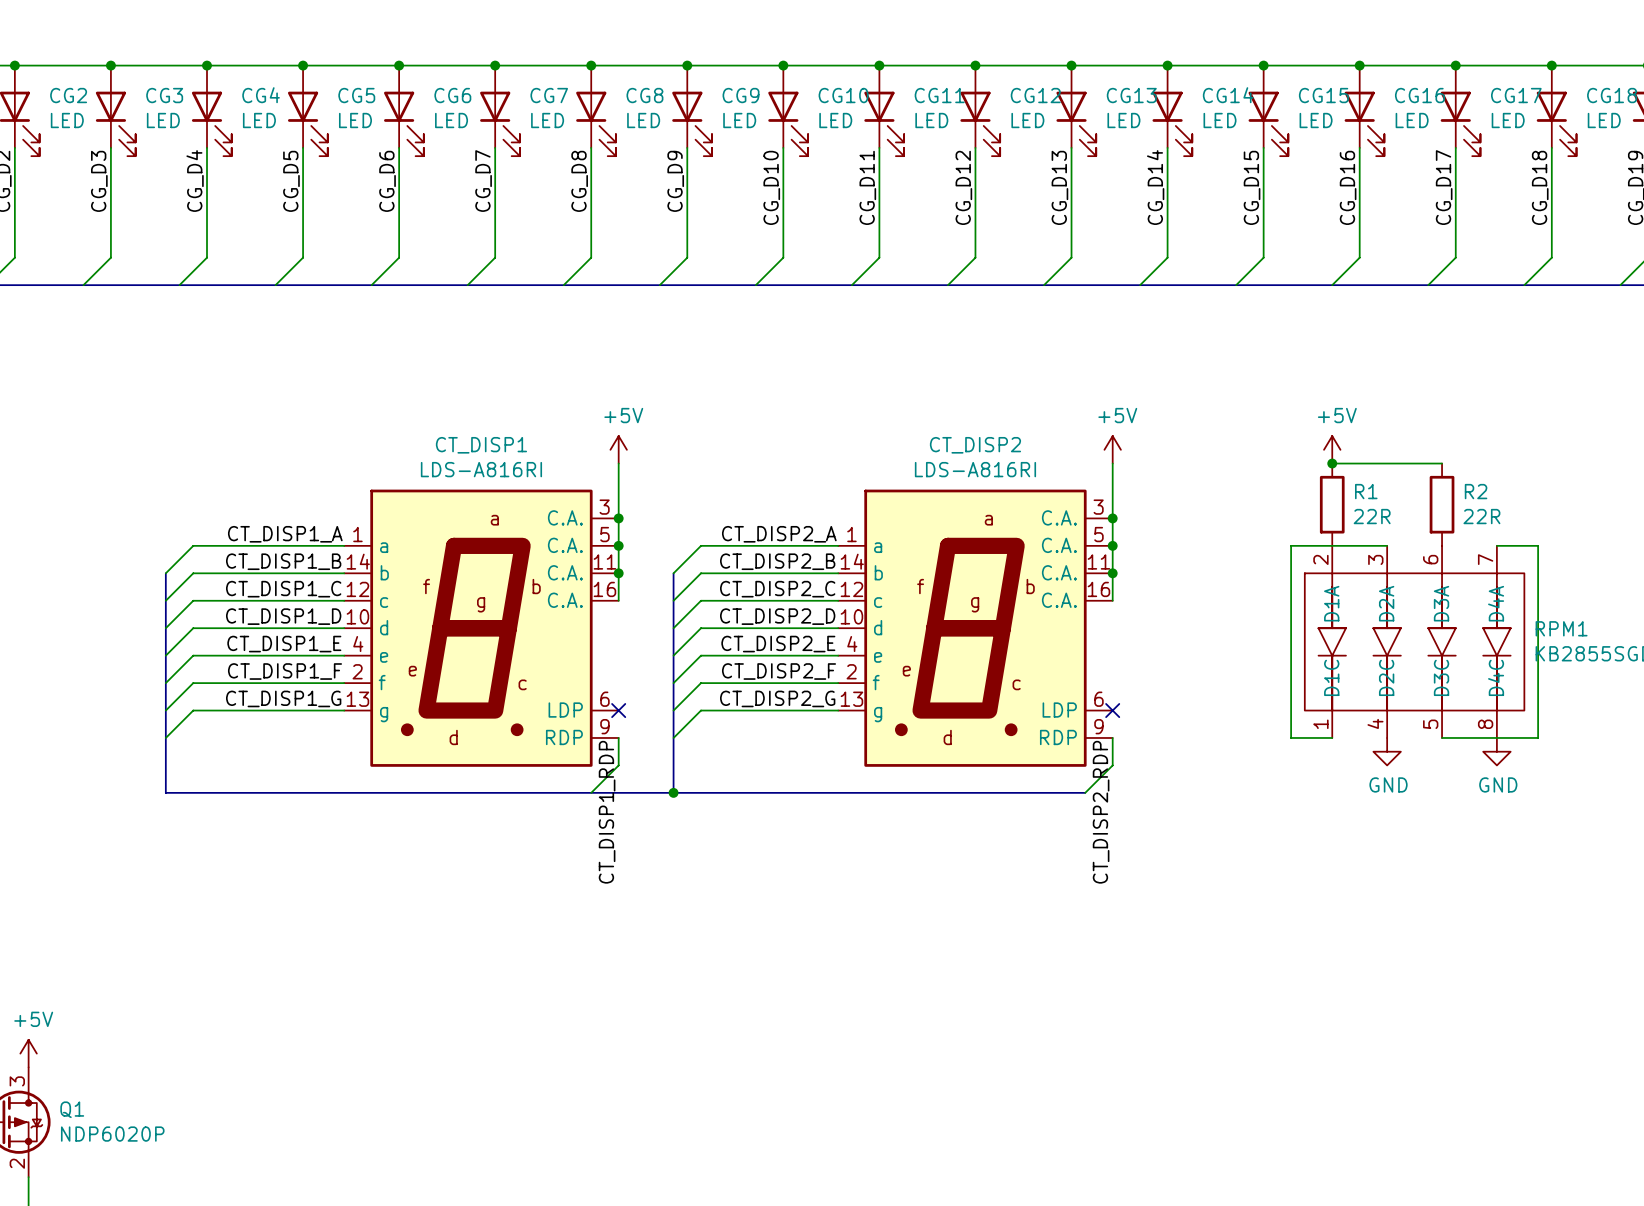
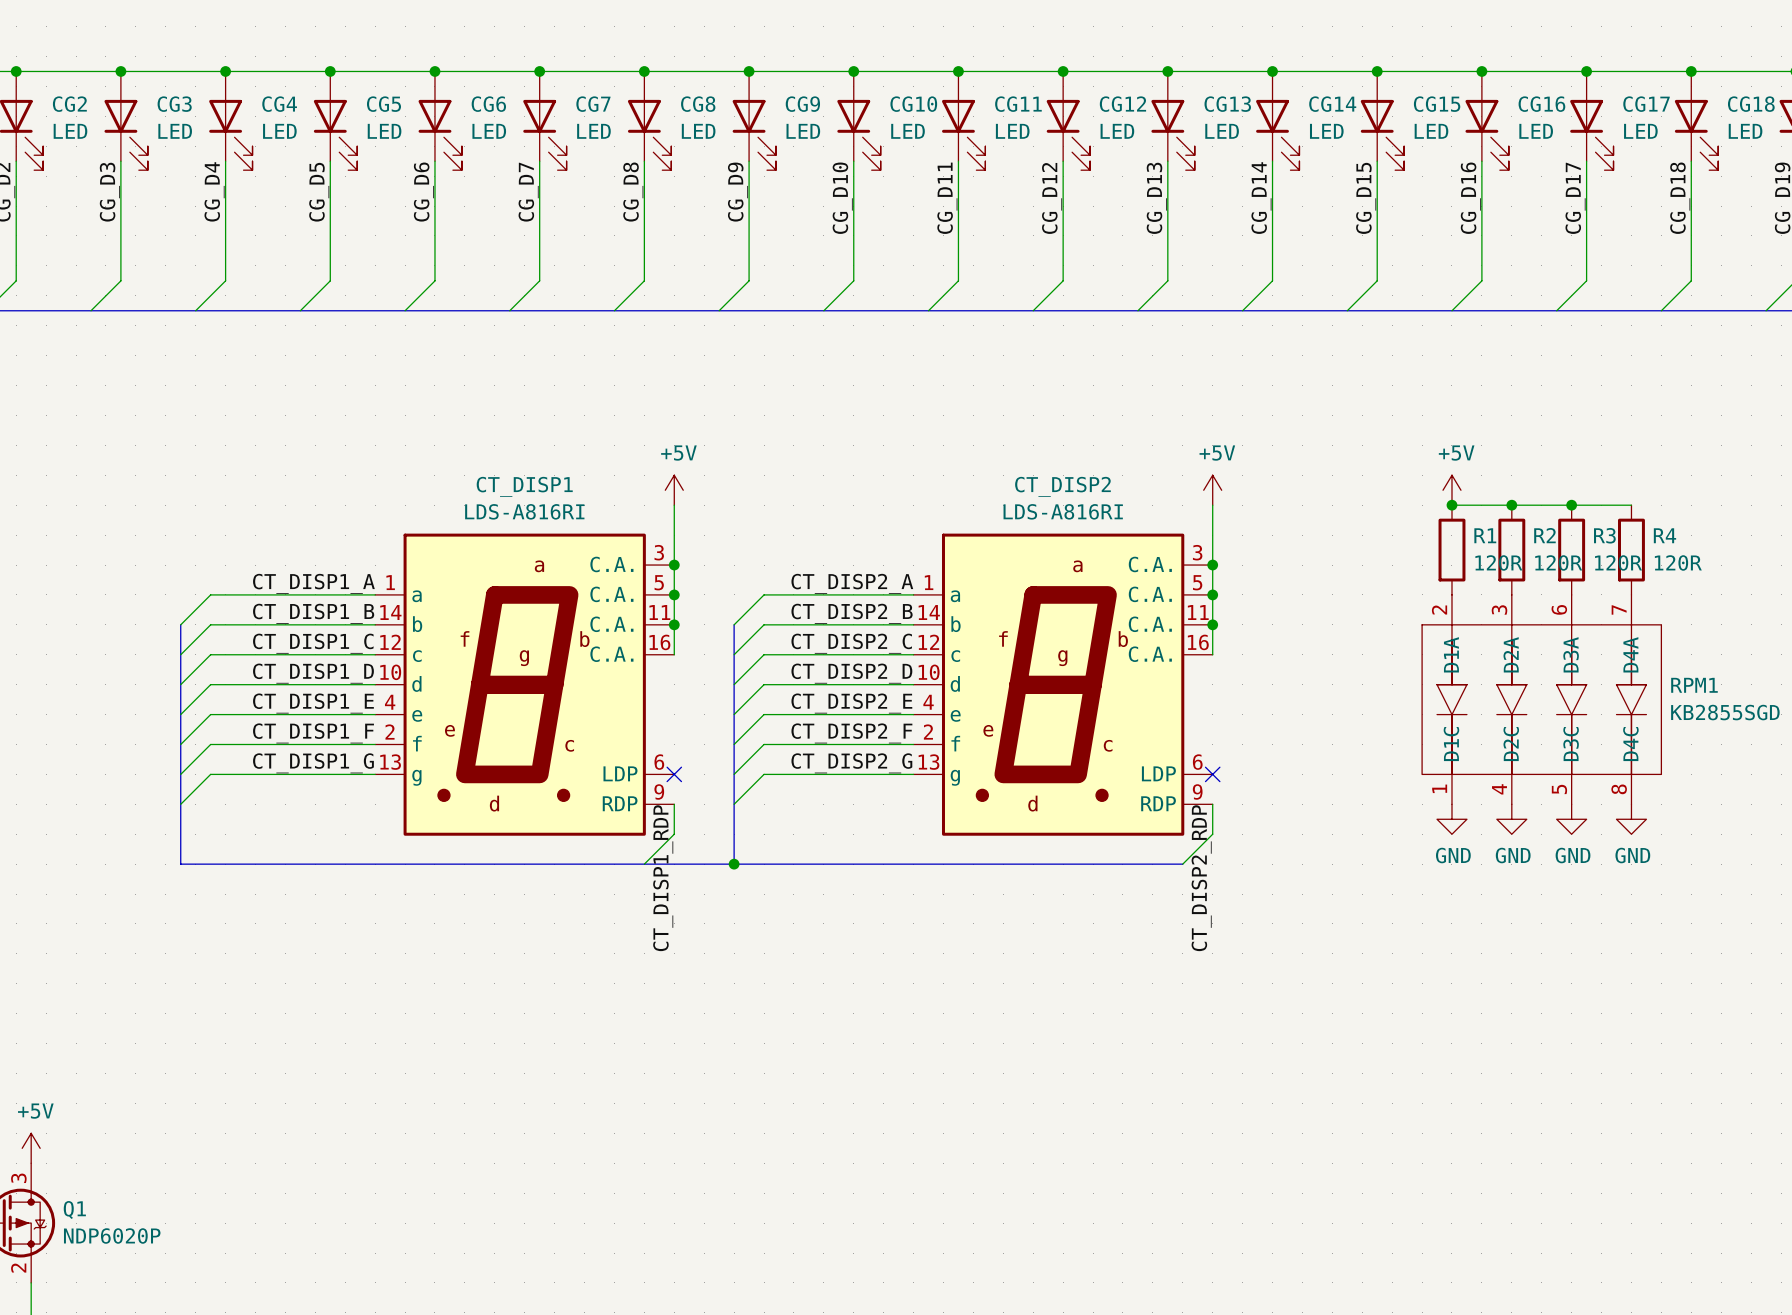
junction: none -> (1511, 505)
wire: none -> (1571, 505) (1631, 505)
junction: none -> (1571, 505)
R2 name: R2 (1476, 491) -> R3 (1604, 535)
R2: none -> 120R (1511, 550)
R4: none -> 120R (1631, 550)
R1 value: 22R (1372, 516) -> 120R (1498, 562)
R2 value: 22R (1481, 516) -> 120R (1618, 562)
wire: (1387, 545) (1291, 545) (1291, 737) (1332, 737) -> none
wire: (1496, 545) (1538, 545) (1538, 737) (1442, 737) -> none
power symbol: none -> GND (1451, 819)
power symbol: none -> GND (1571, 819)

